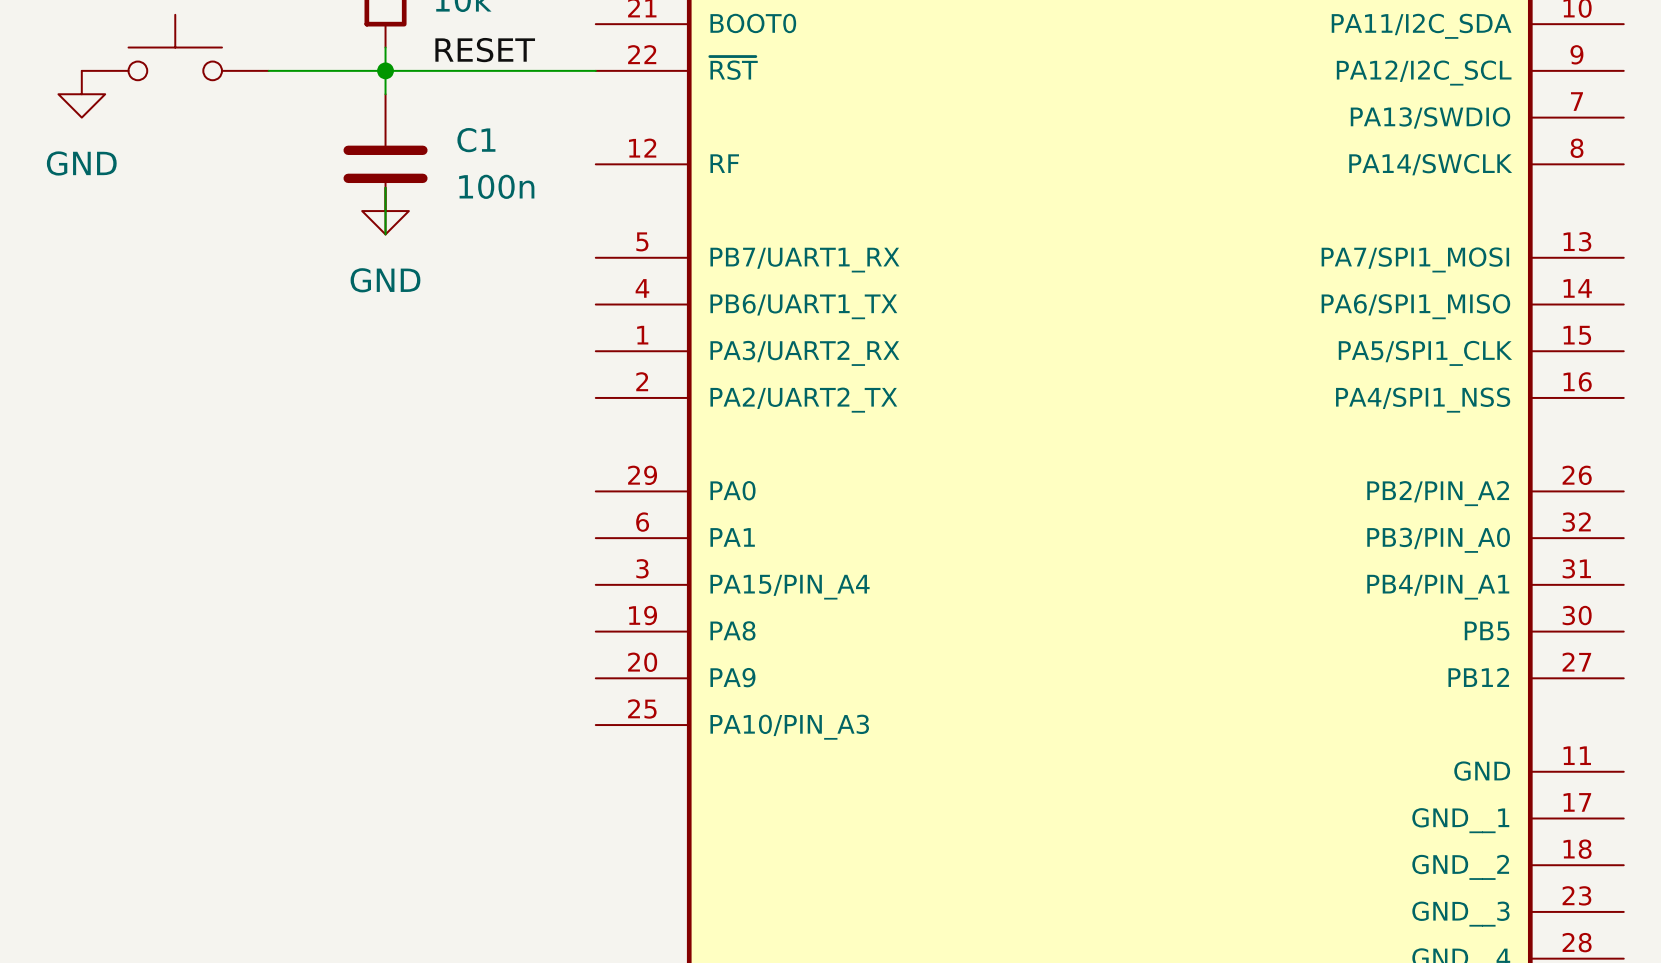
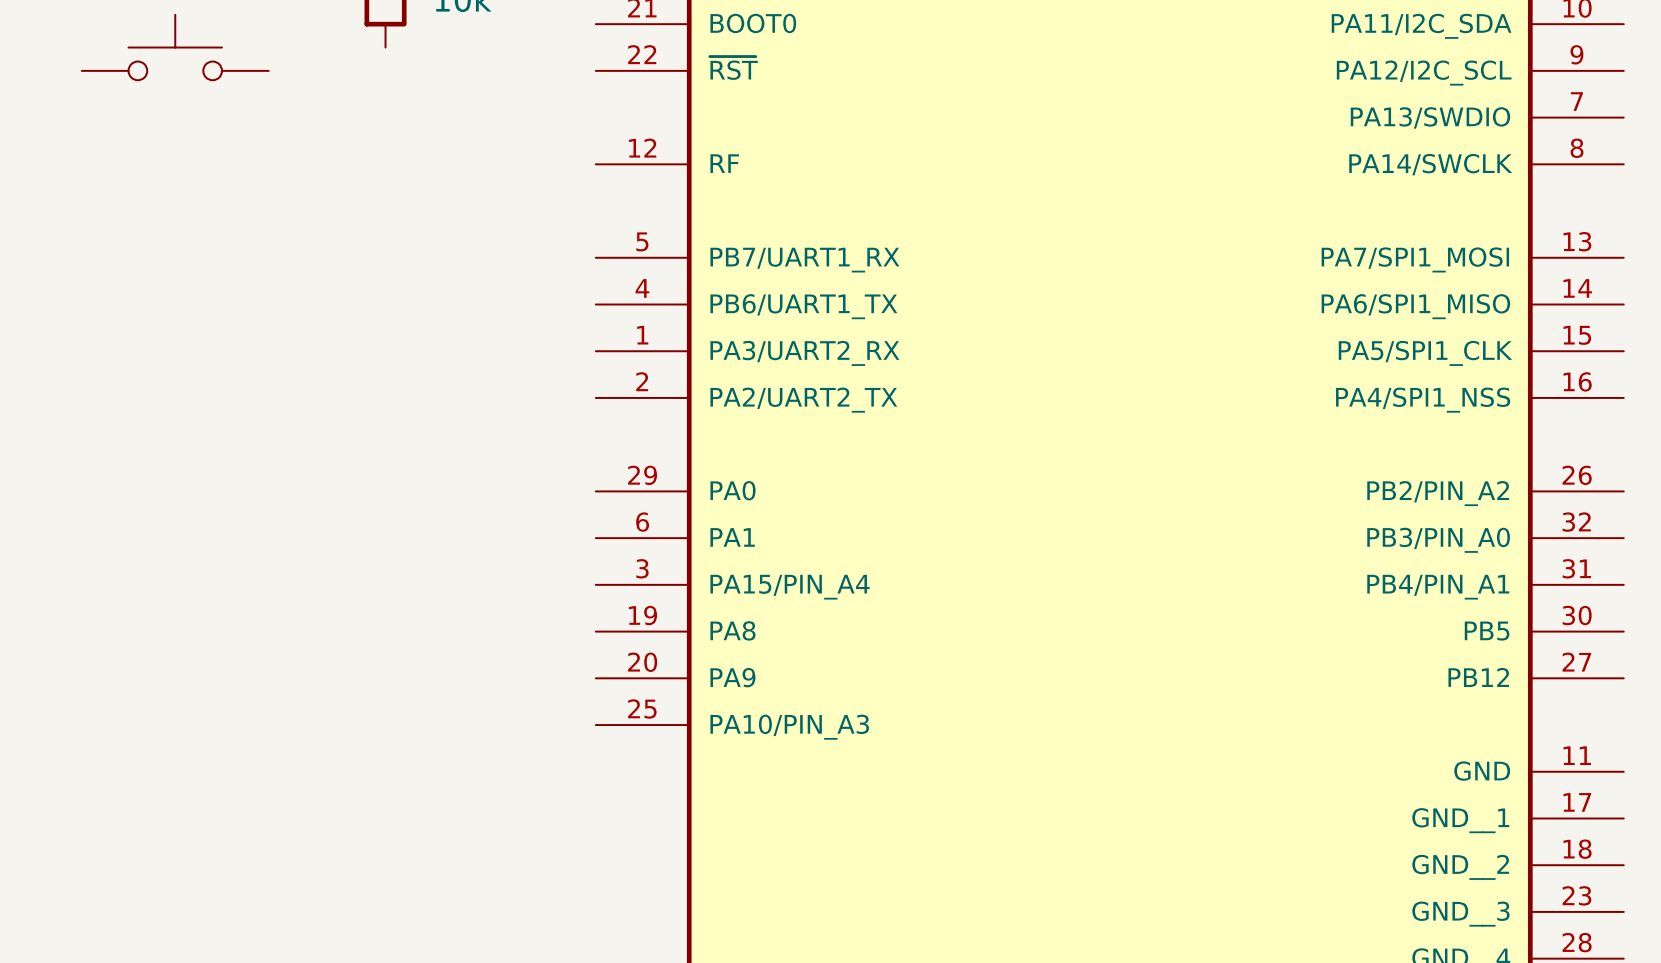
wire: (385, 47) (385, 94) -> none
label: RESET (485, 50) -> none
wire: (268, 70) (595, 70) -> none
junction: (385, 70) -> none
power symbol: GND (81, 94) -> none
C1: 100n (385, 164) -> none
wire: (385, 187) (385, 234) -> none
power symbol: GND (385, 211) -> none

